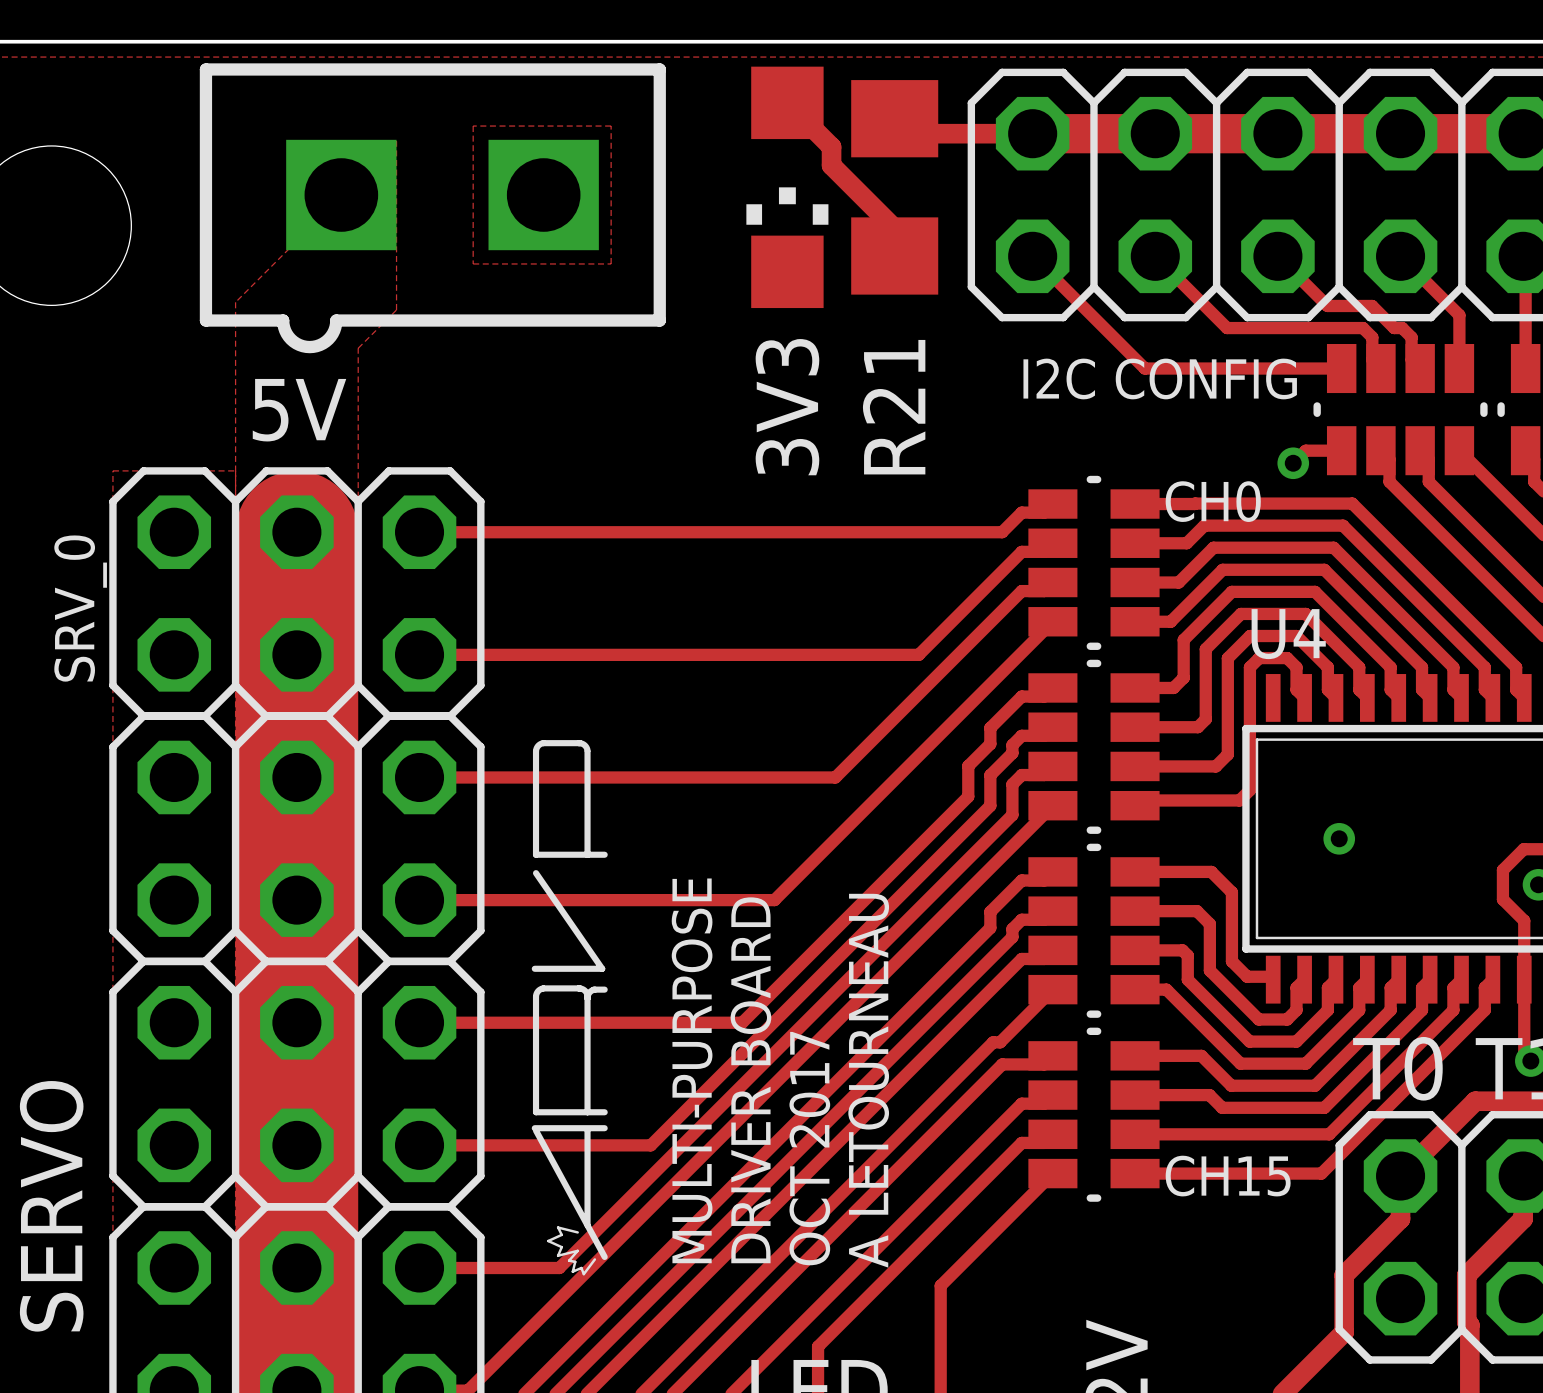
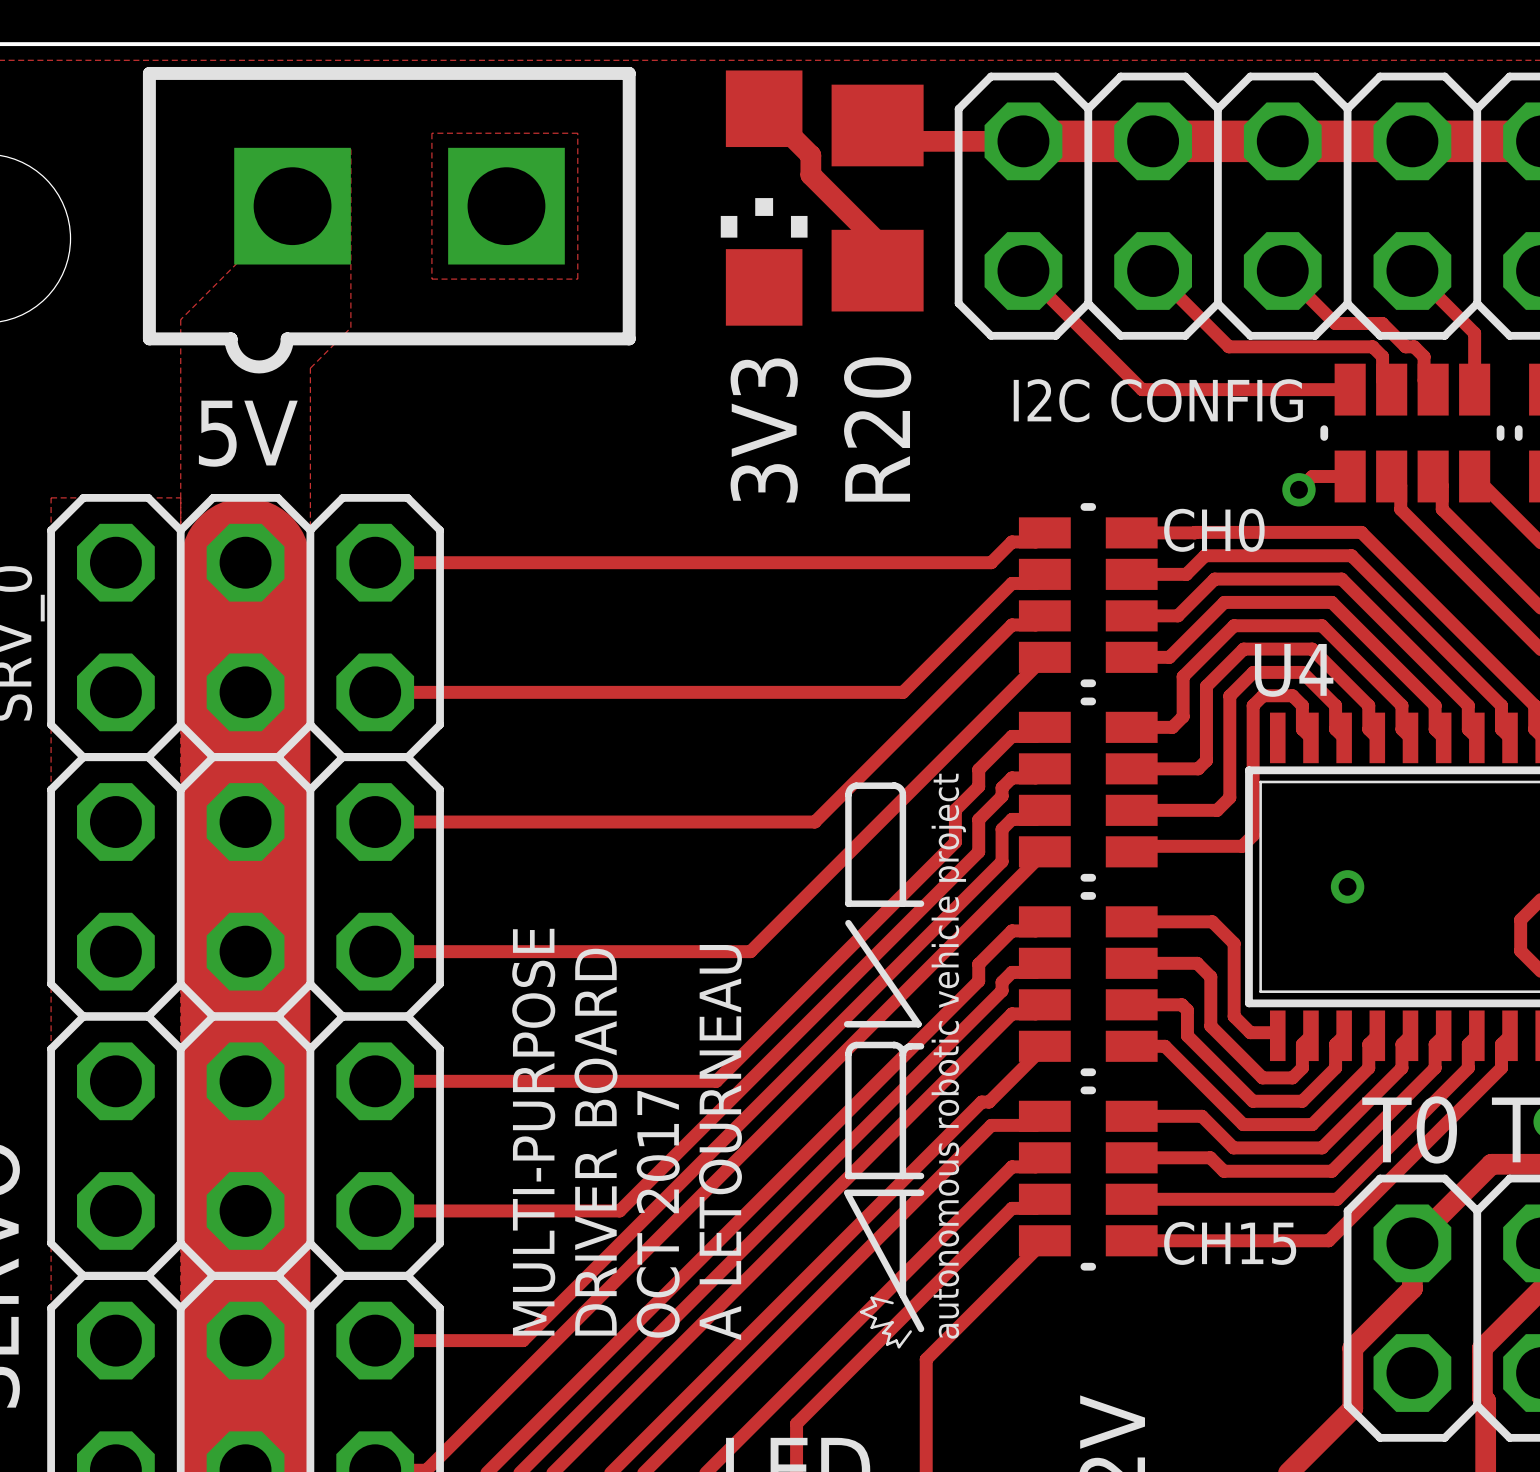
R21 name: R21 (894, 407) -> R20 (877, 429)
drawing: [531, 740, 608, 1276] -> none
drawing: none -> [843, 782, 925, 1349]
text: none -> MULTI-PURPOSE (533, 1132)
text: MULTI-PURPOSE (692, 1070) -> OCT 2017 (658, 1214)
text: none -> DRIVER BOARD (595, 1142)
text: DRIVER BOARD (750, 1080) -> A LETOURNEAU (720, 1142)
text: A LETOURNEAU (868, 1080) -> none
text: OCT 2017 (809, 1148) -> none

